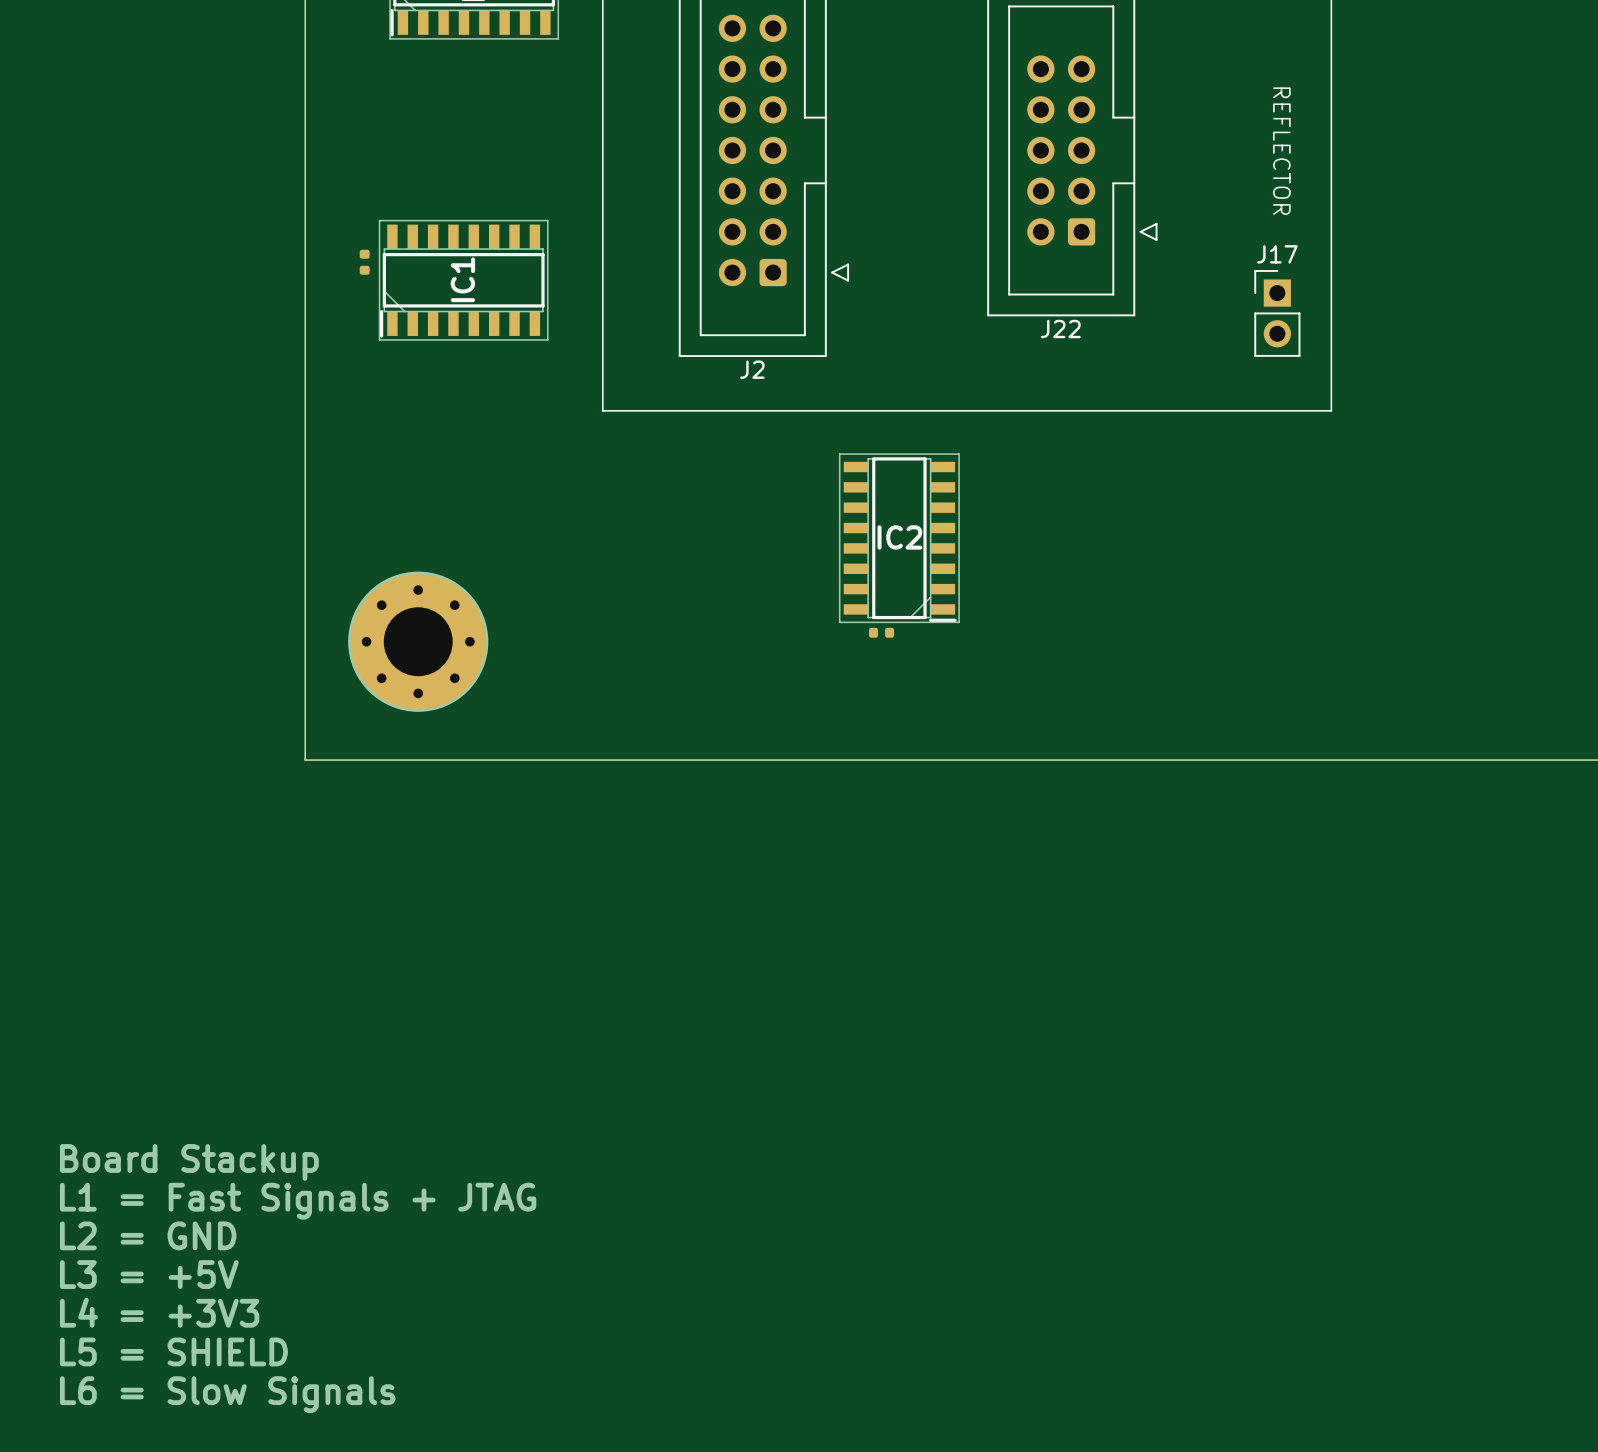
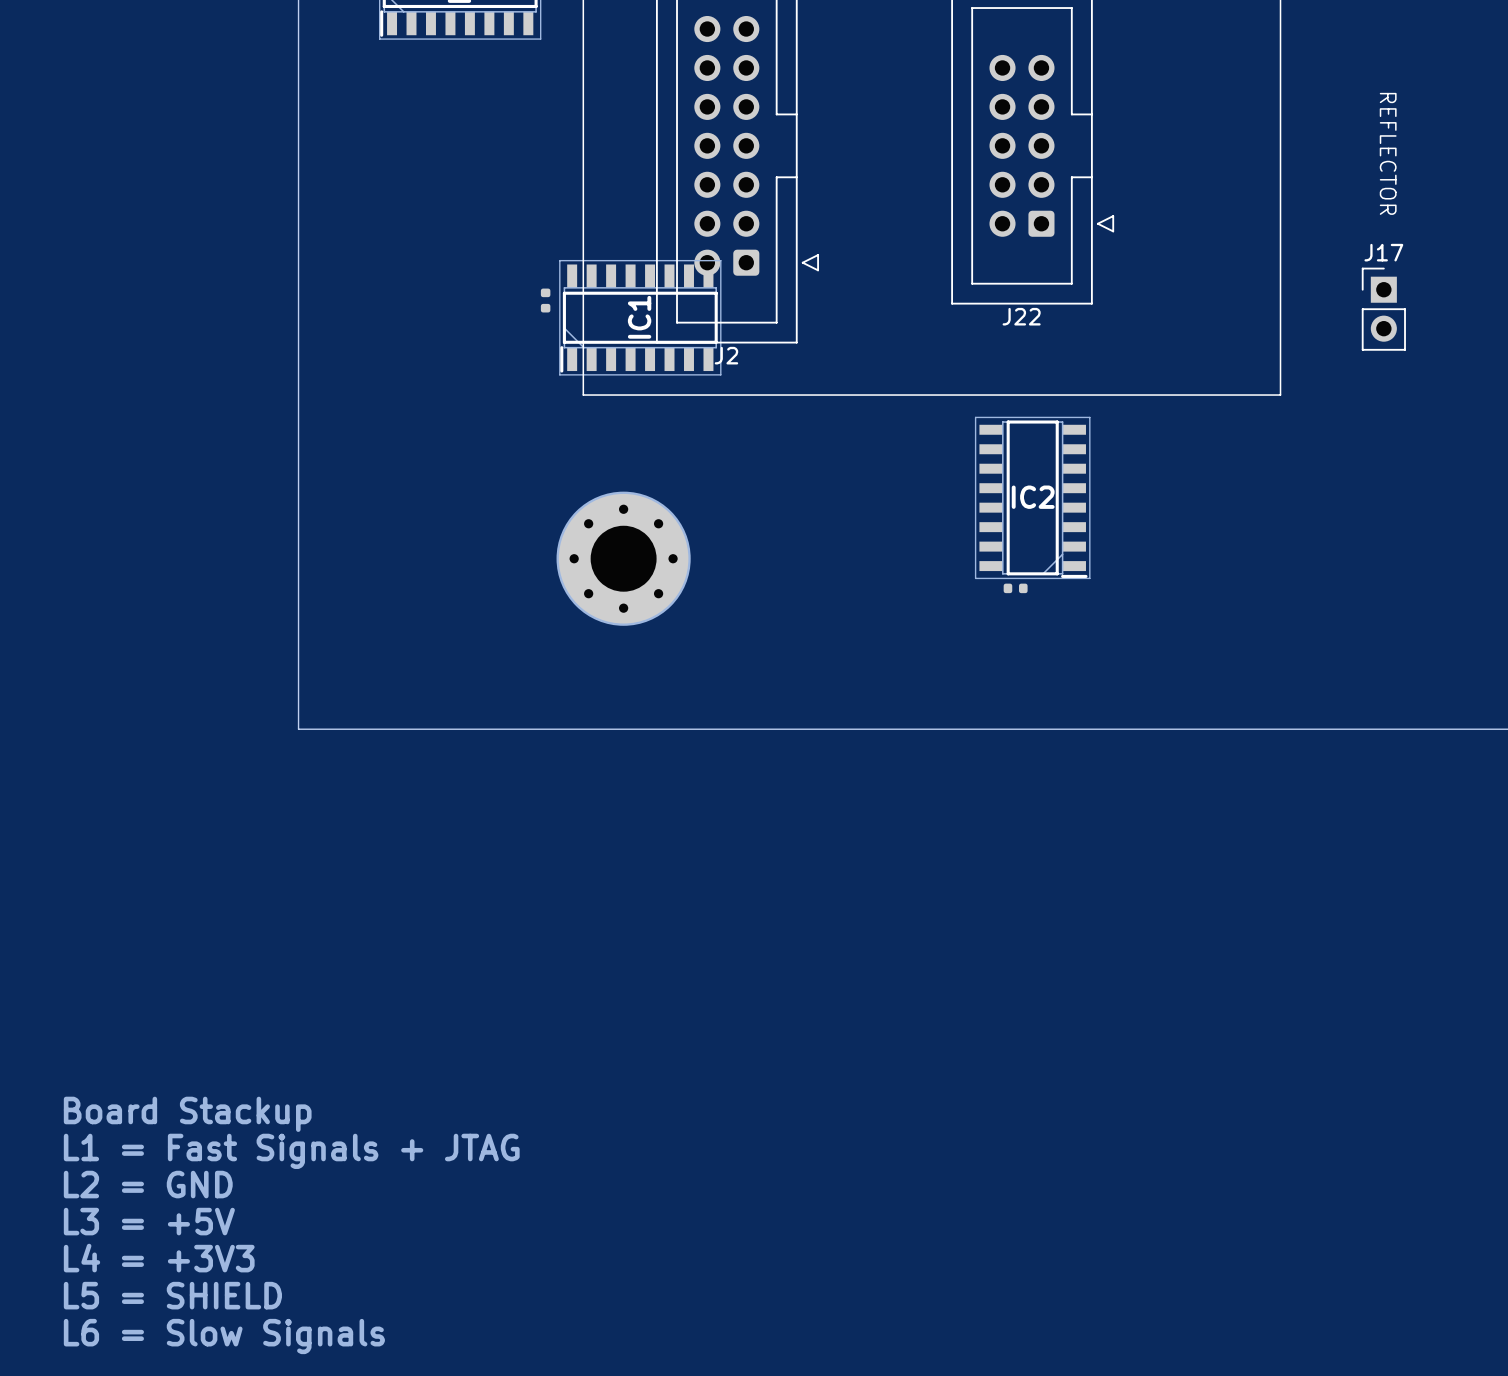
text position: REFLECTOR (1281, 151) -> REFLECTOR (1388, 153)
part: (364, 262) -> none
IC1 position: (463, 280) -> (640, 317)
part: none -> (545, 300)
J17 position: (1277, 313) -> (1383, 309)
IC2 position: (899, 538) -> (1032, 497)
part position: (881, 632) -> (1015, 588)
part position: (418, 641) -> (623, 558)

